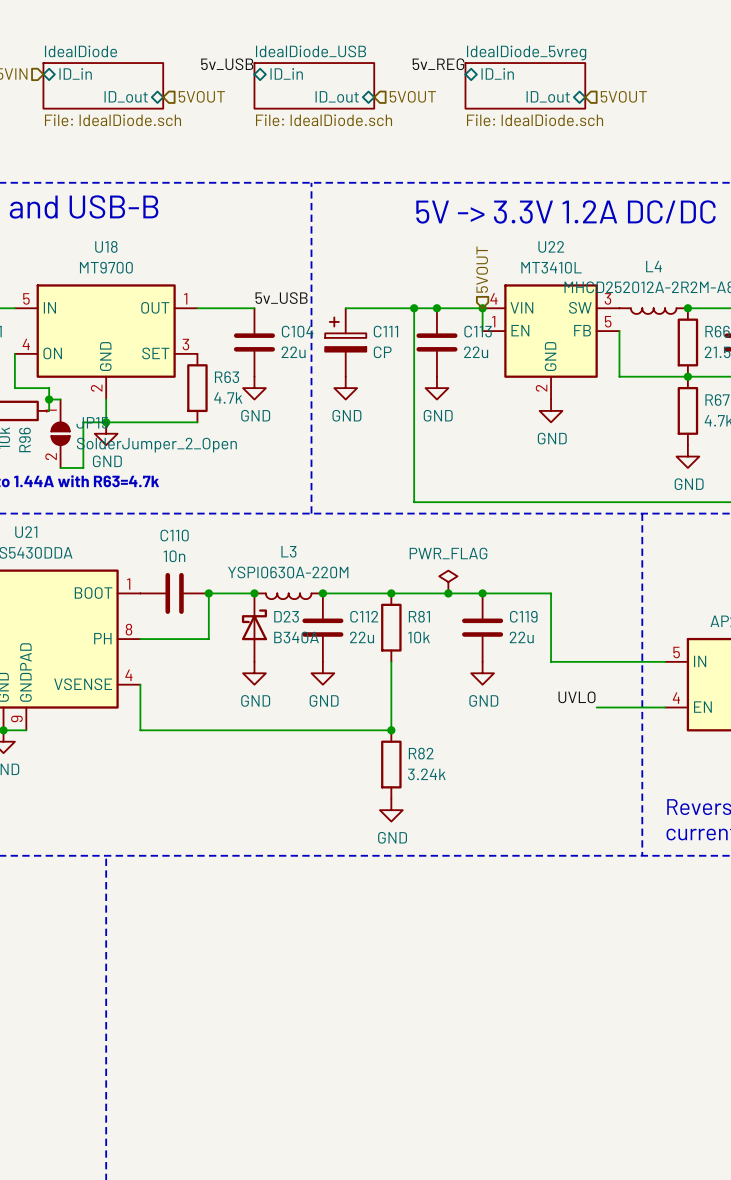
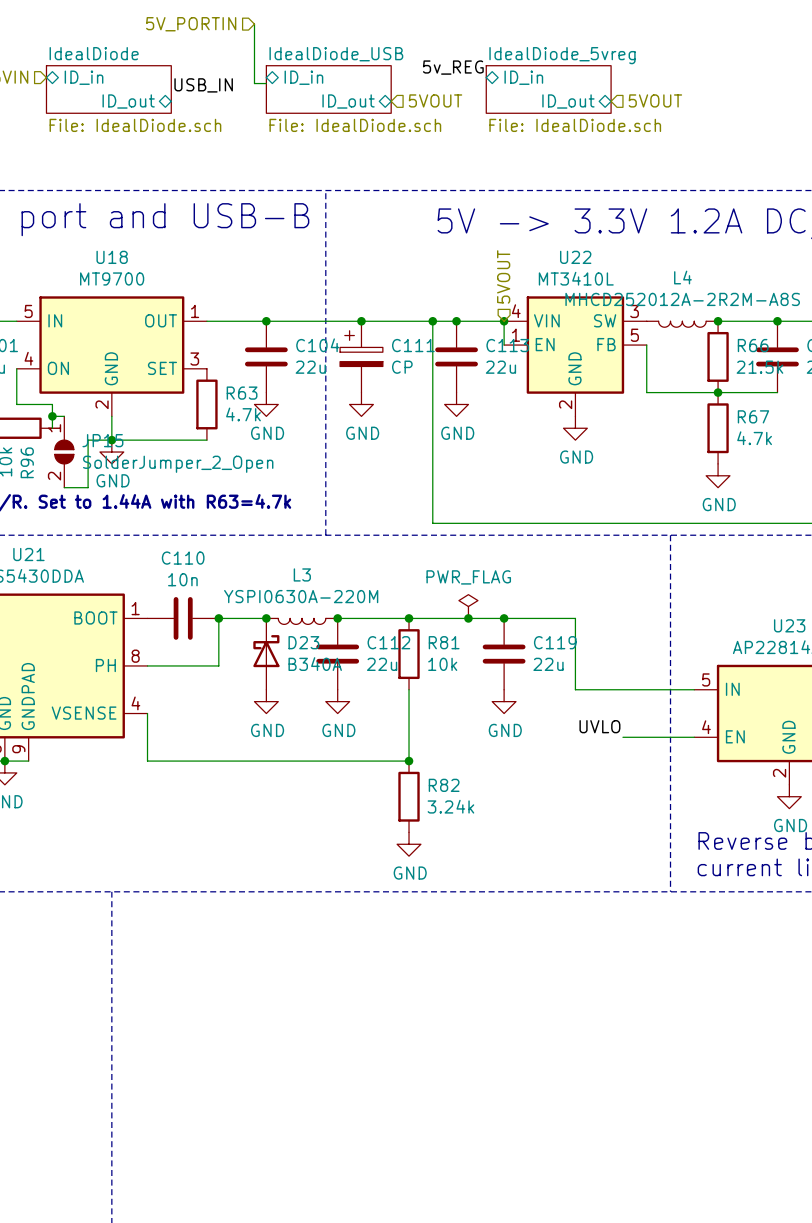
hierarchical label: none -> 5V_PORTIN (191, 24)
wire: none -> (254, 24) (254, 83) (266, 83)
label: 5v_USB (227, 64) -> none
label: none -> USB_IN (203, 85)
hierarchical label: 5VOUT (201, 96) -> none
label: 5v_USB (281, 298) -> none
wire: none -> (266, 321) (361, 321)
junction: none -> (266, 321)
junction: none -> (361, 321)

